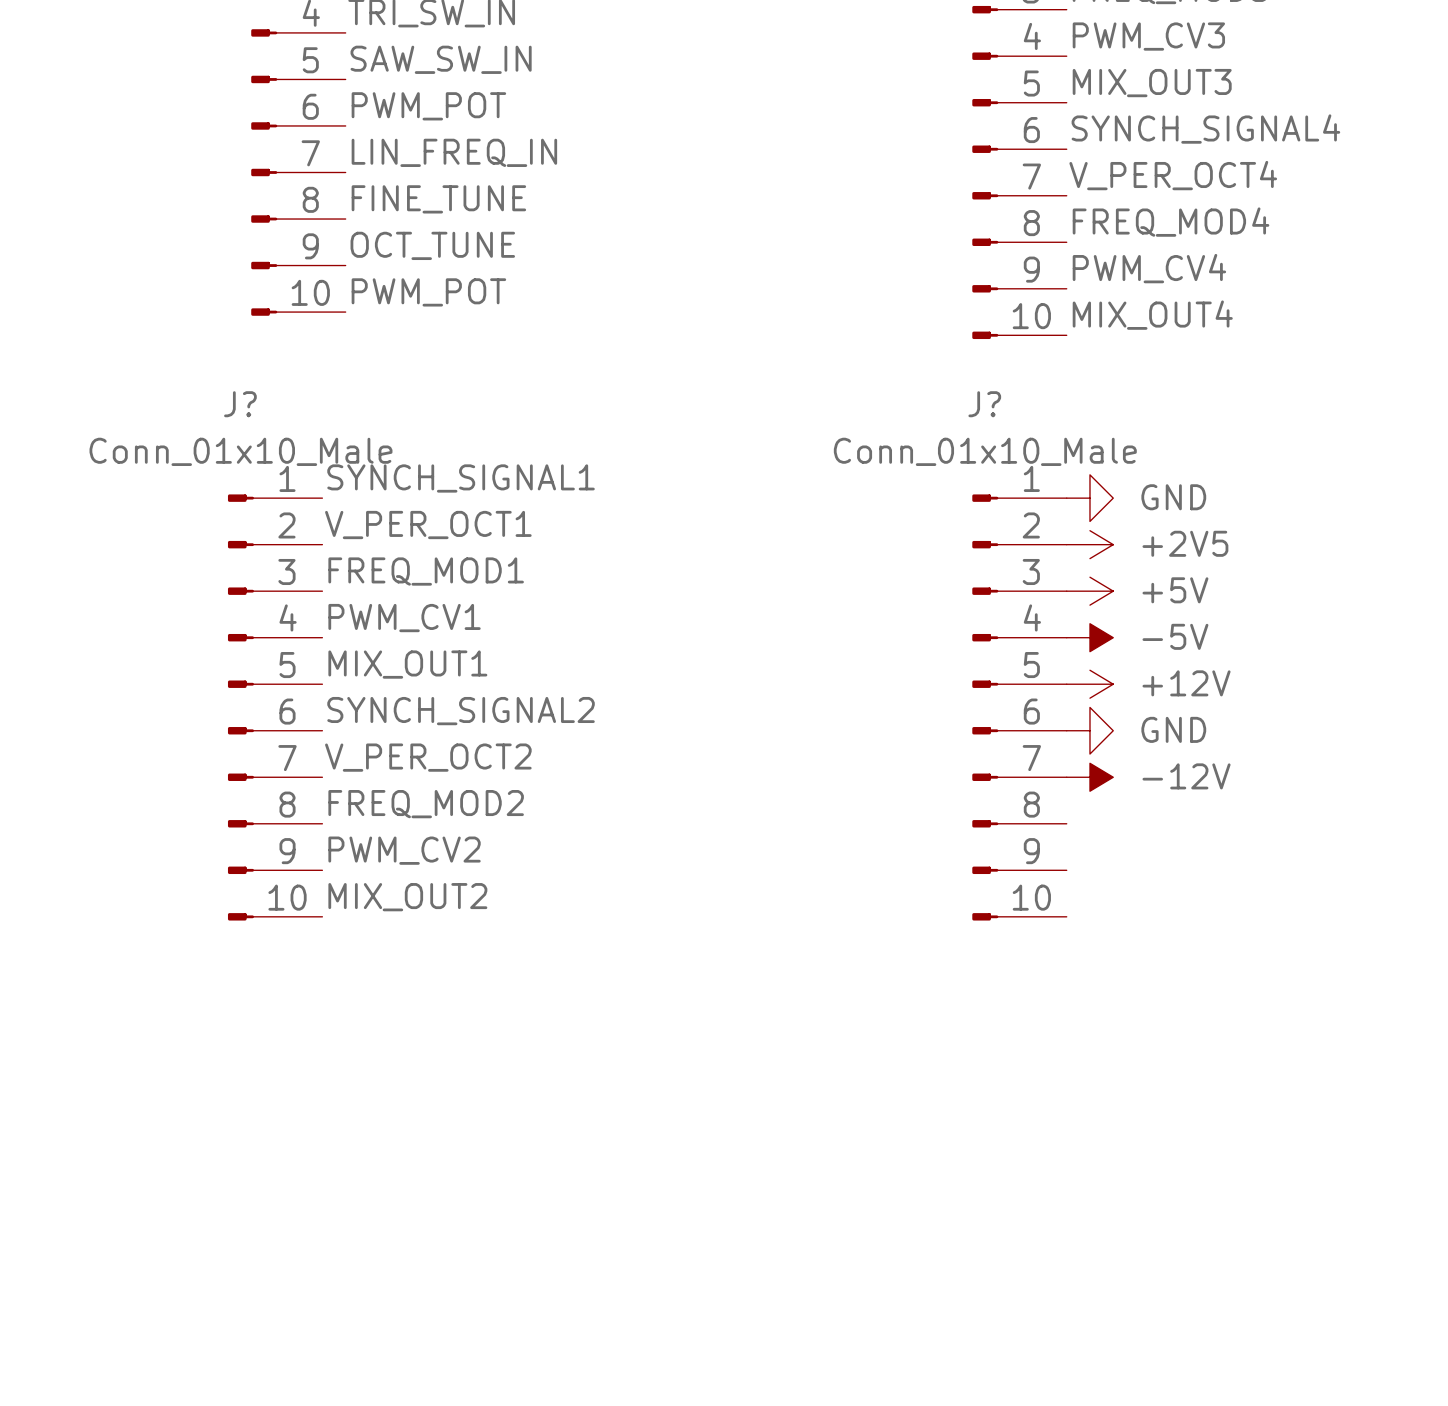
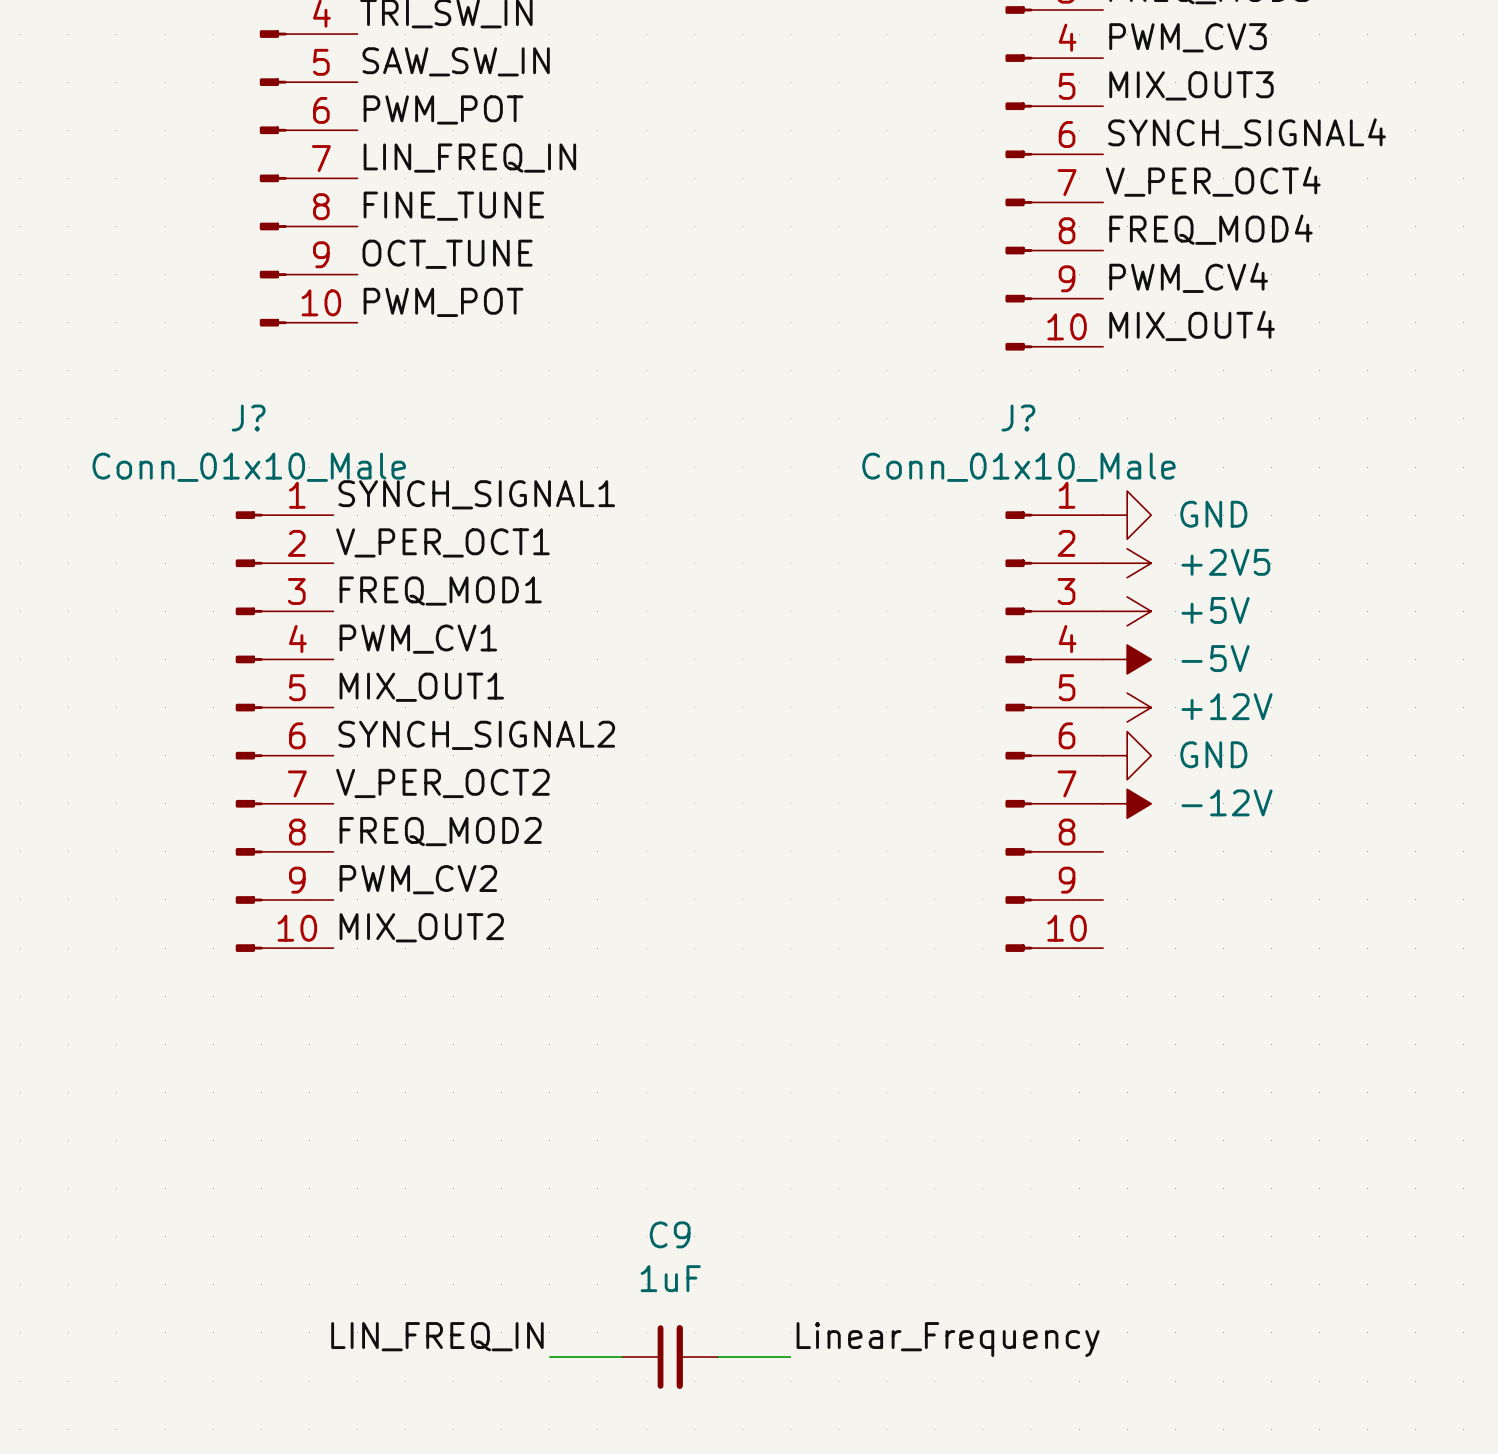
label: none -> LIN_FREQ_IN (437, 1336)
label: none -> Linear_Frequency (948, 1339)
wire: none -> (549, 1357) (622, 1357)
C9: none -> 1uF (670, 1357)
wire: none -> (718, 1357) (790, 1357)

